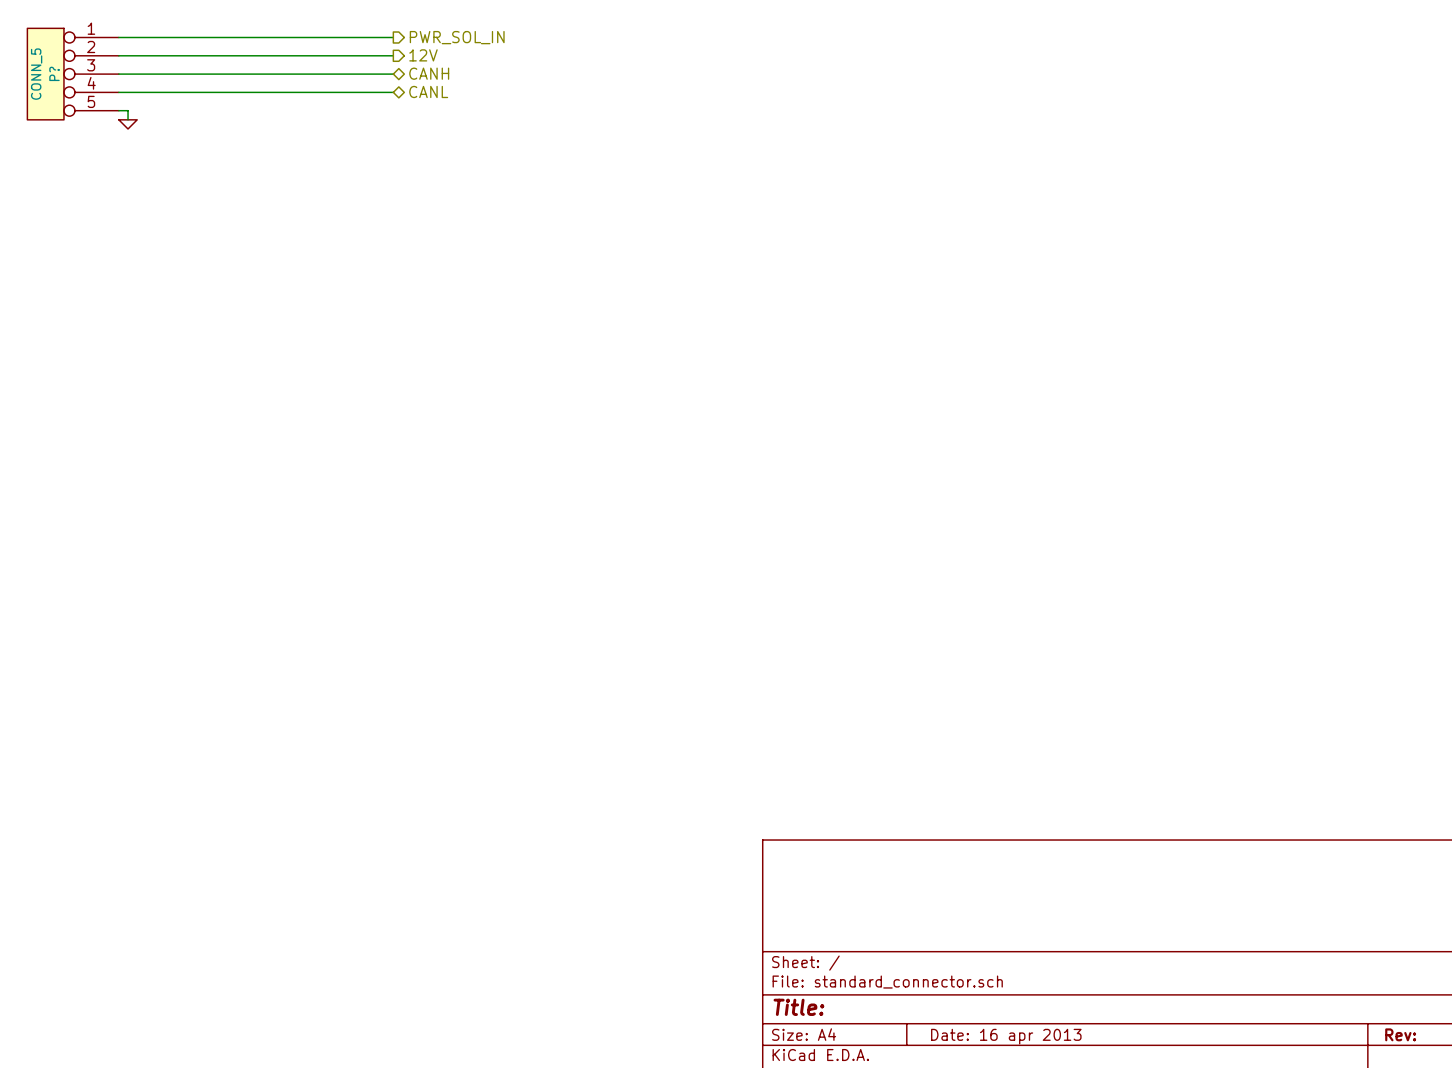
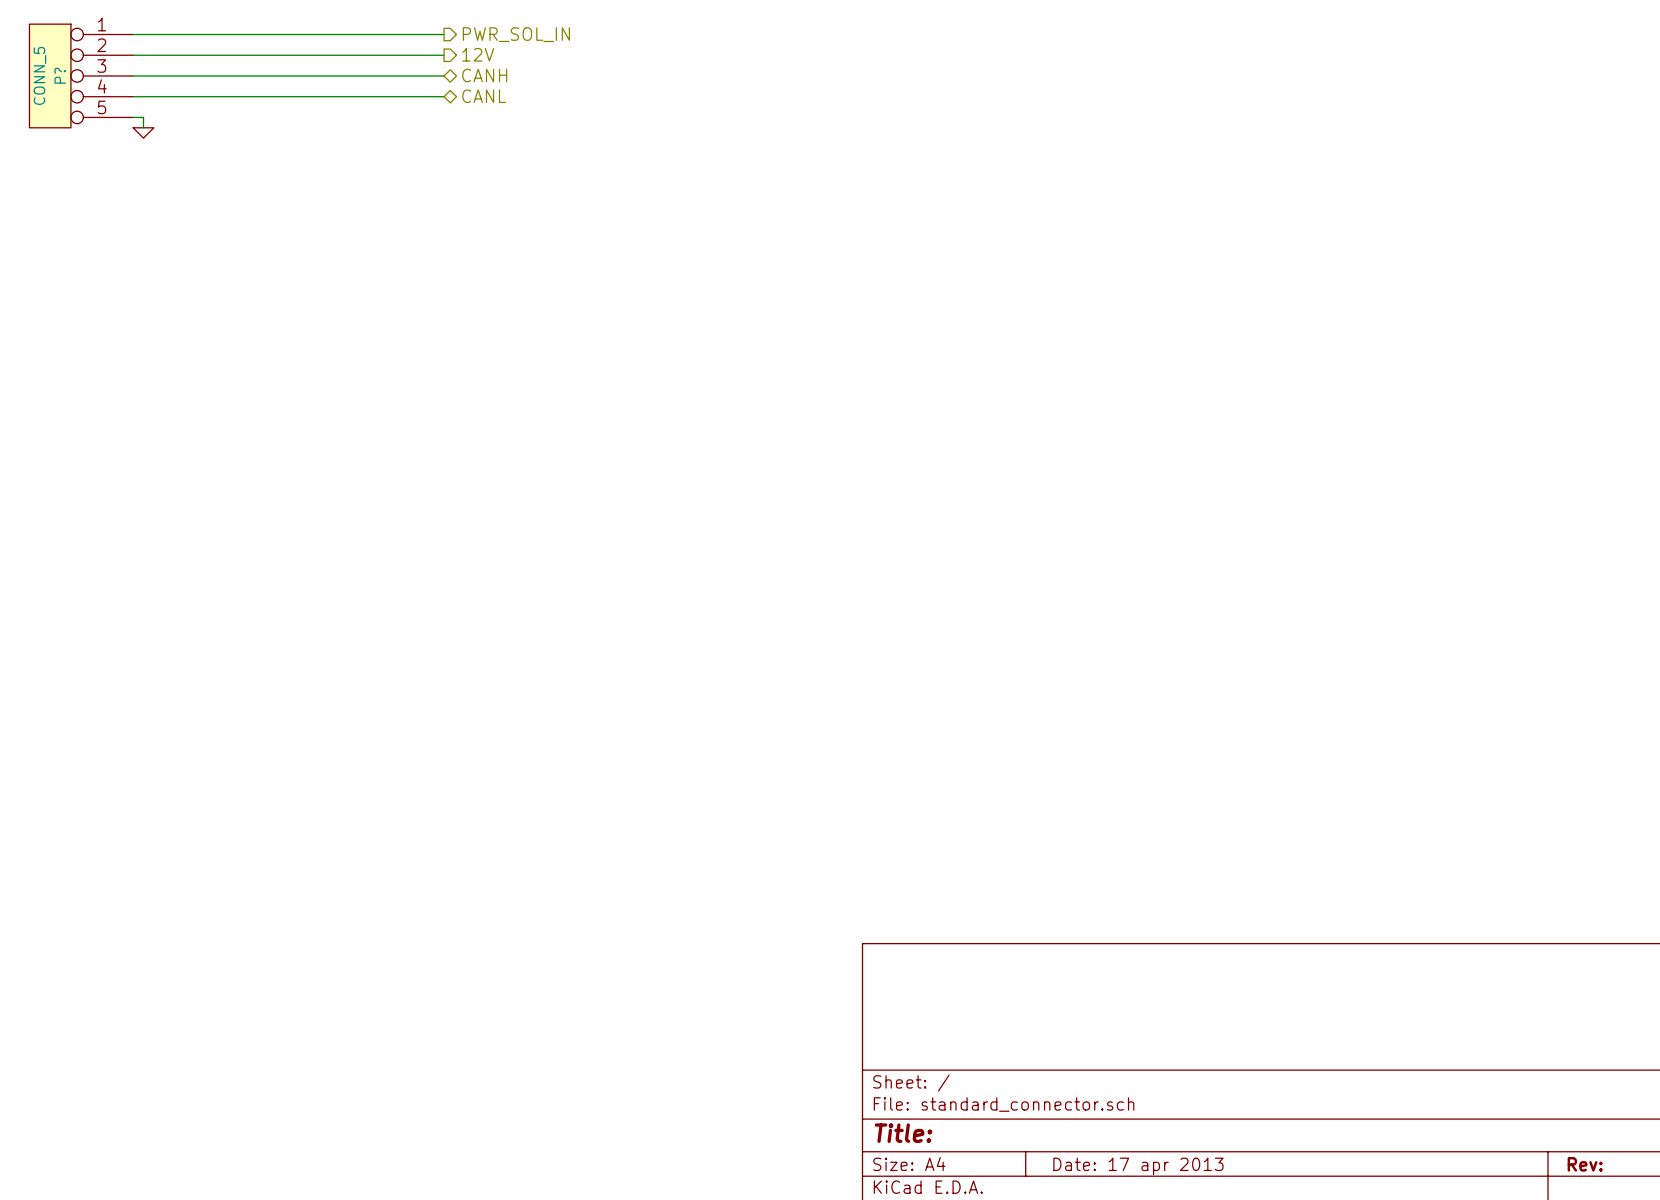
title block: Date: 16 apr 2013 (1006, 1036) -> Date: 17 apr 2013 (1138, 1166)

